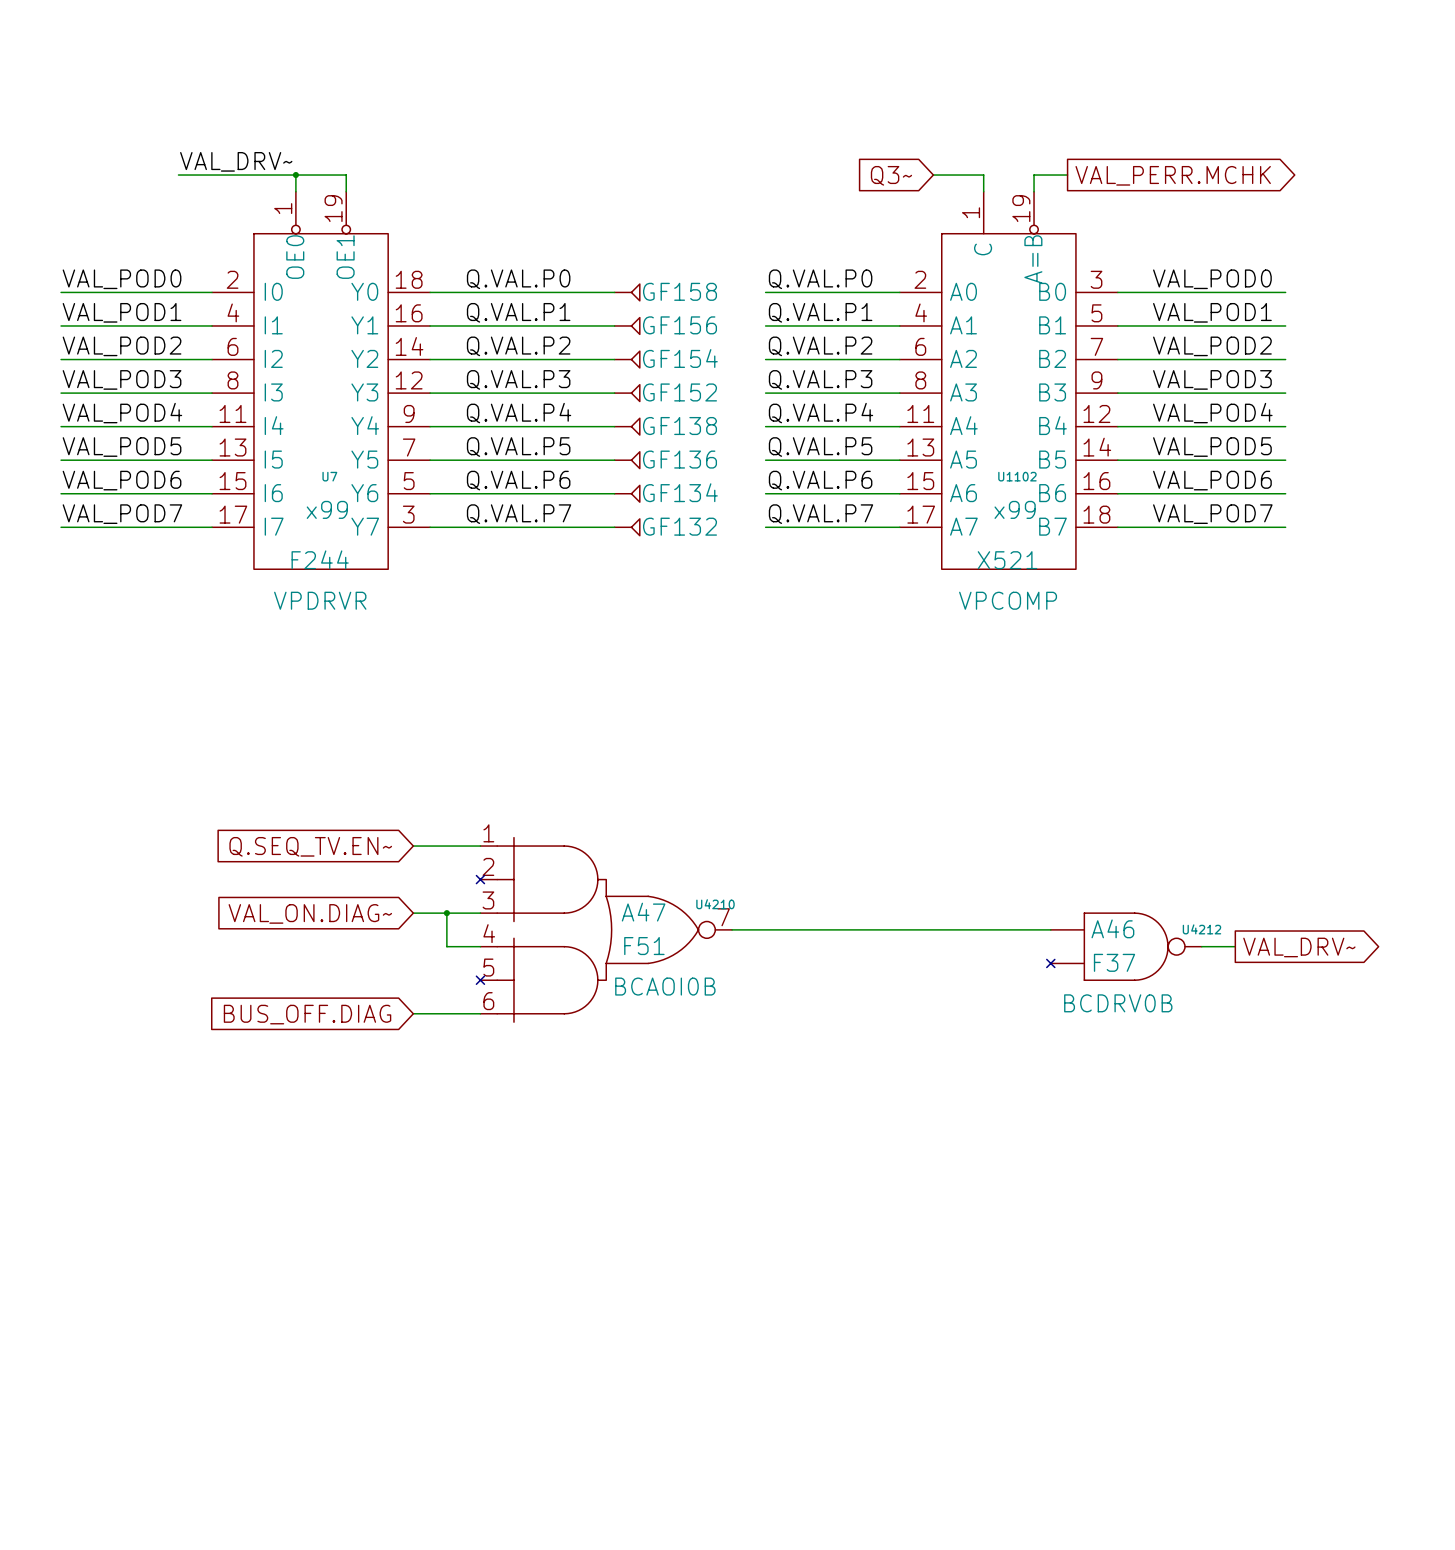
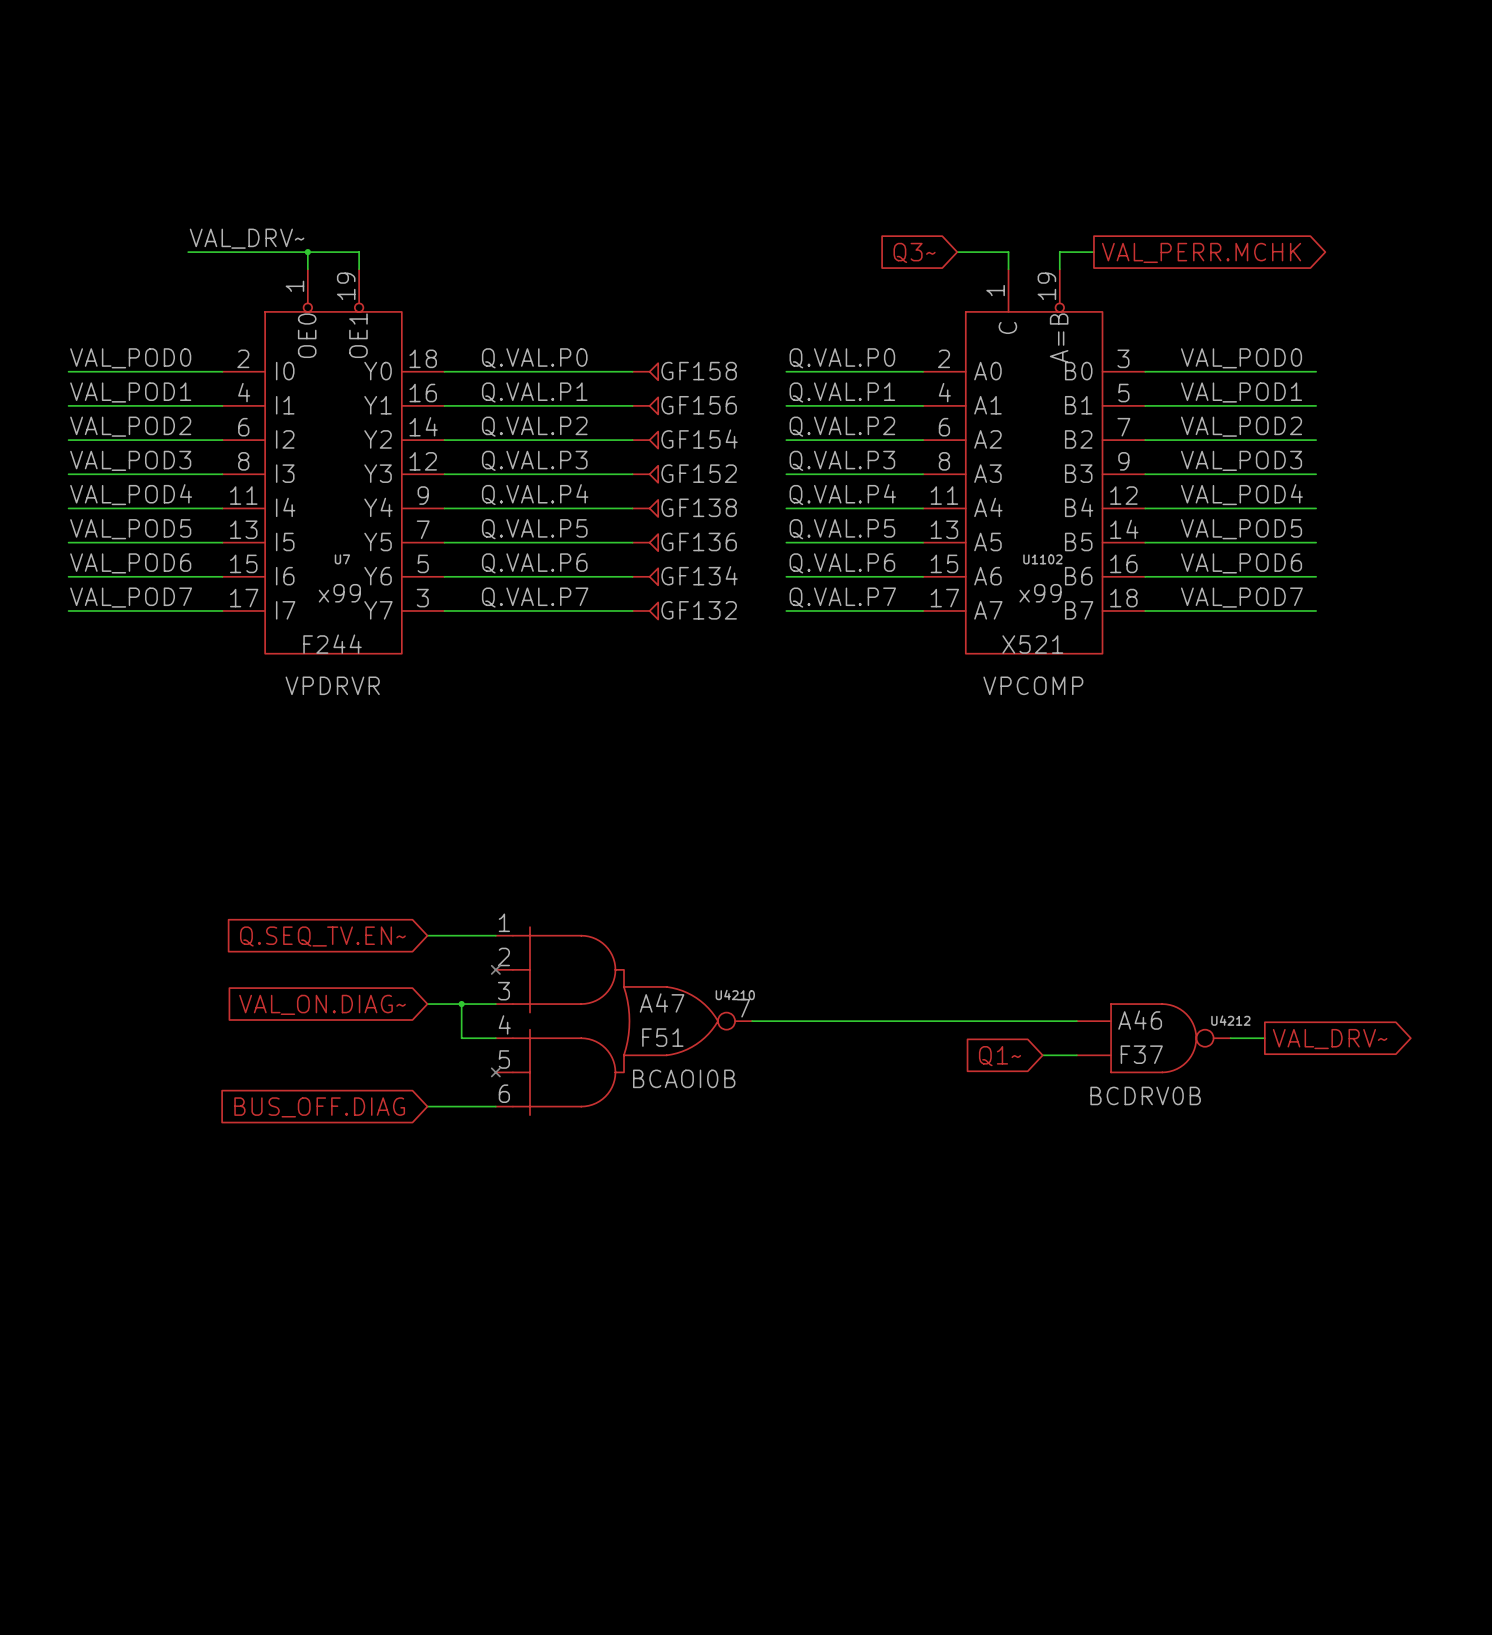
wire: none -> (1042, 1055) (1076, 1055)
no-connect mark: (1050, 963) -> none
global label: none -> Q1~ (1000, 1056)

